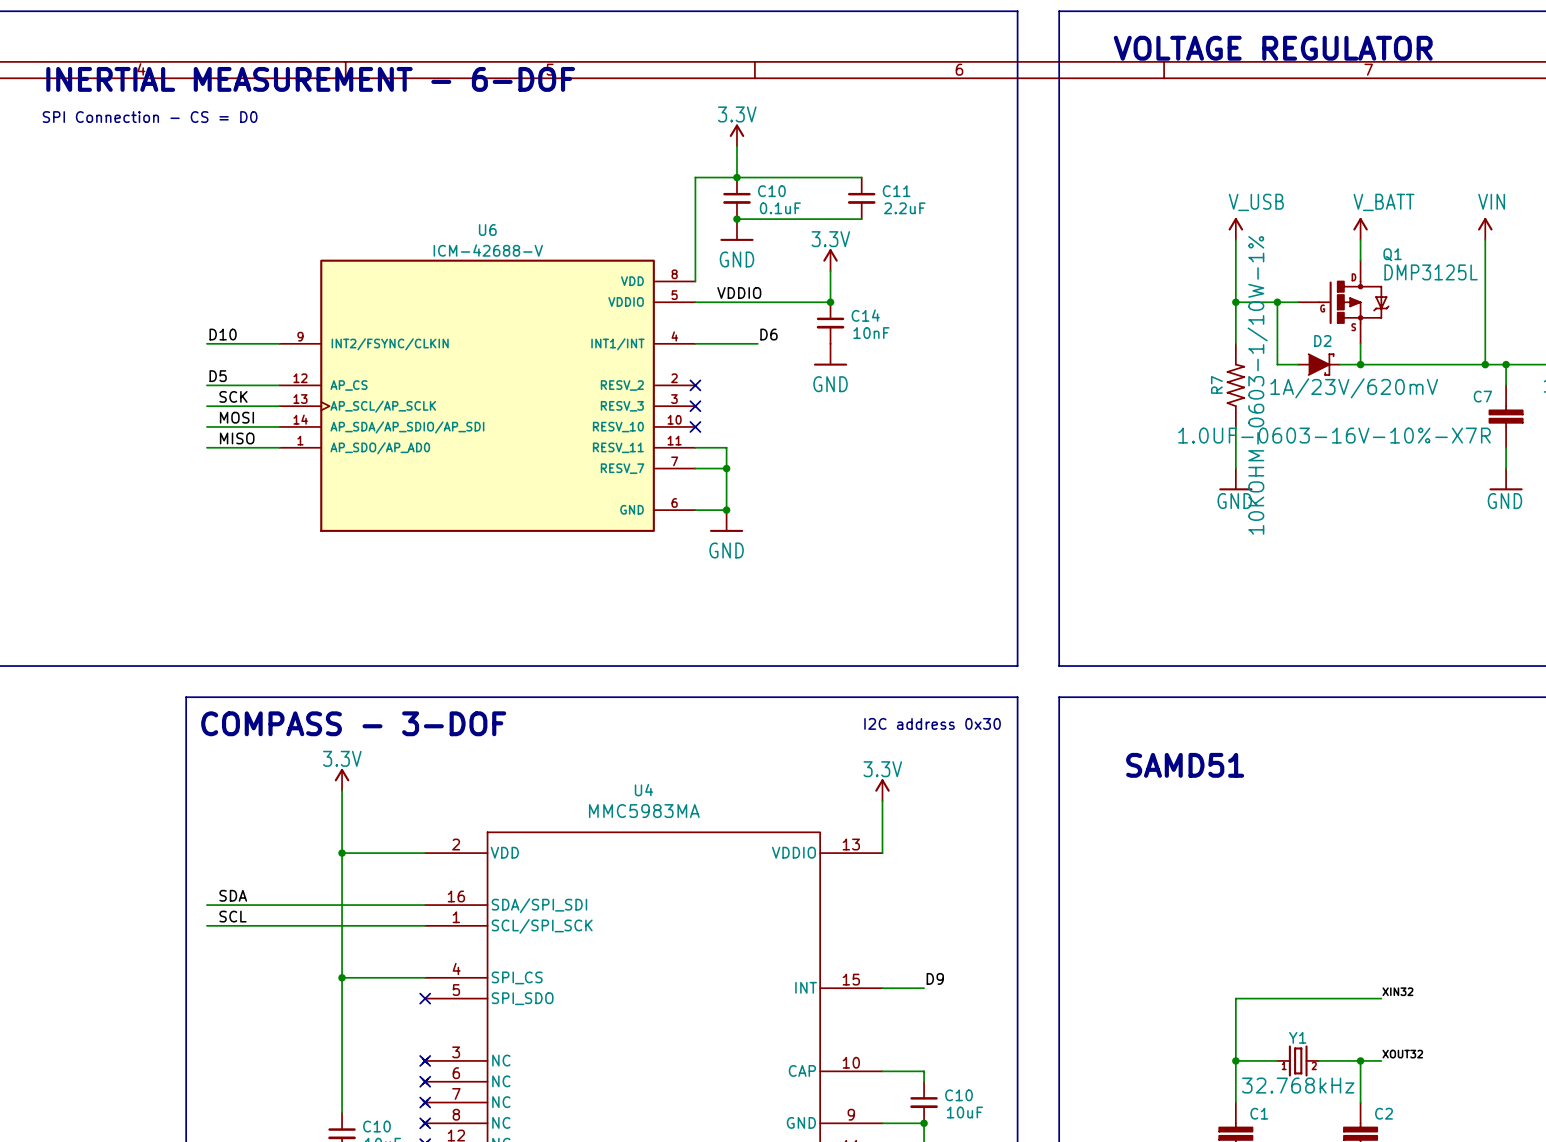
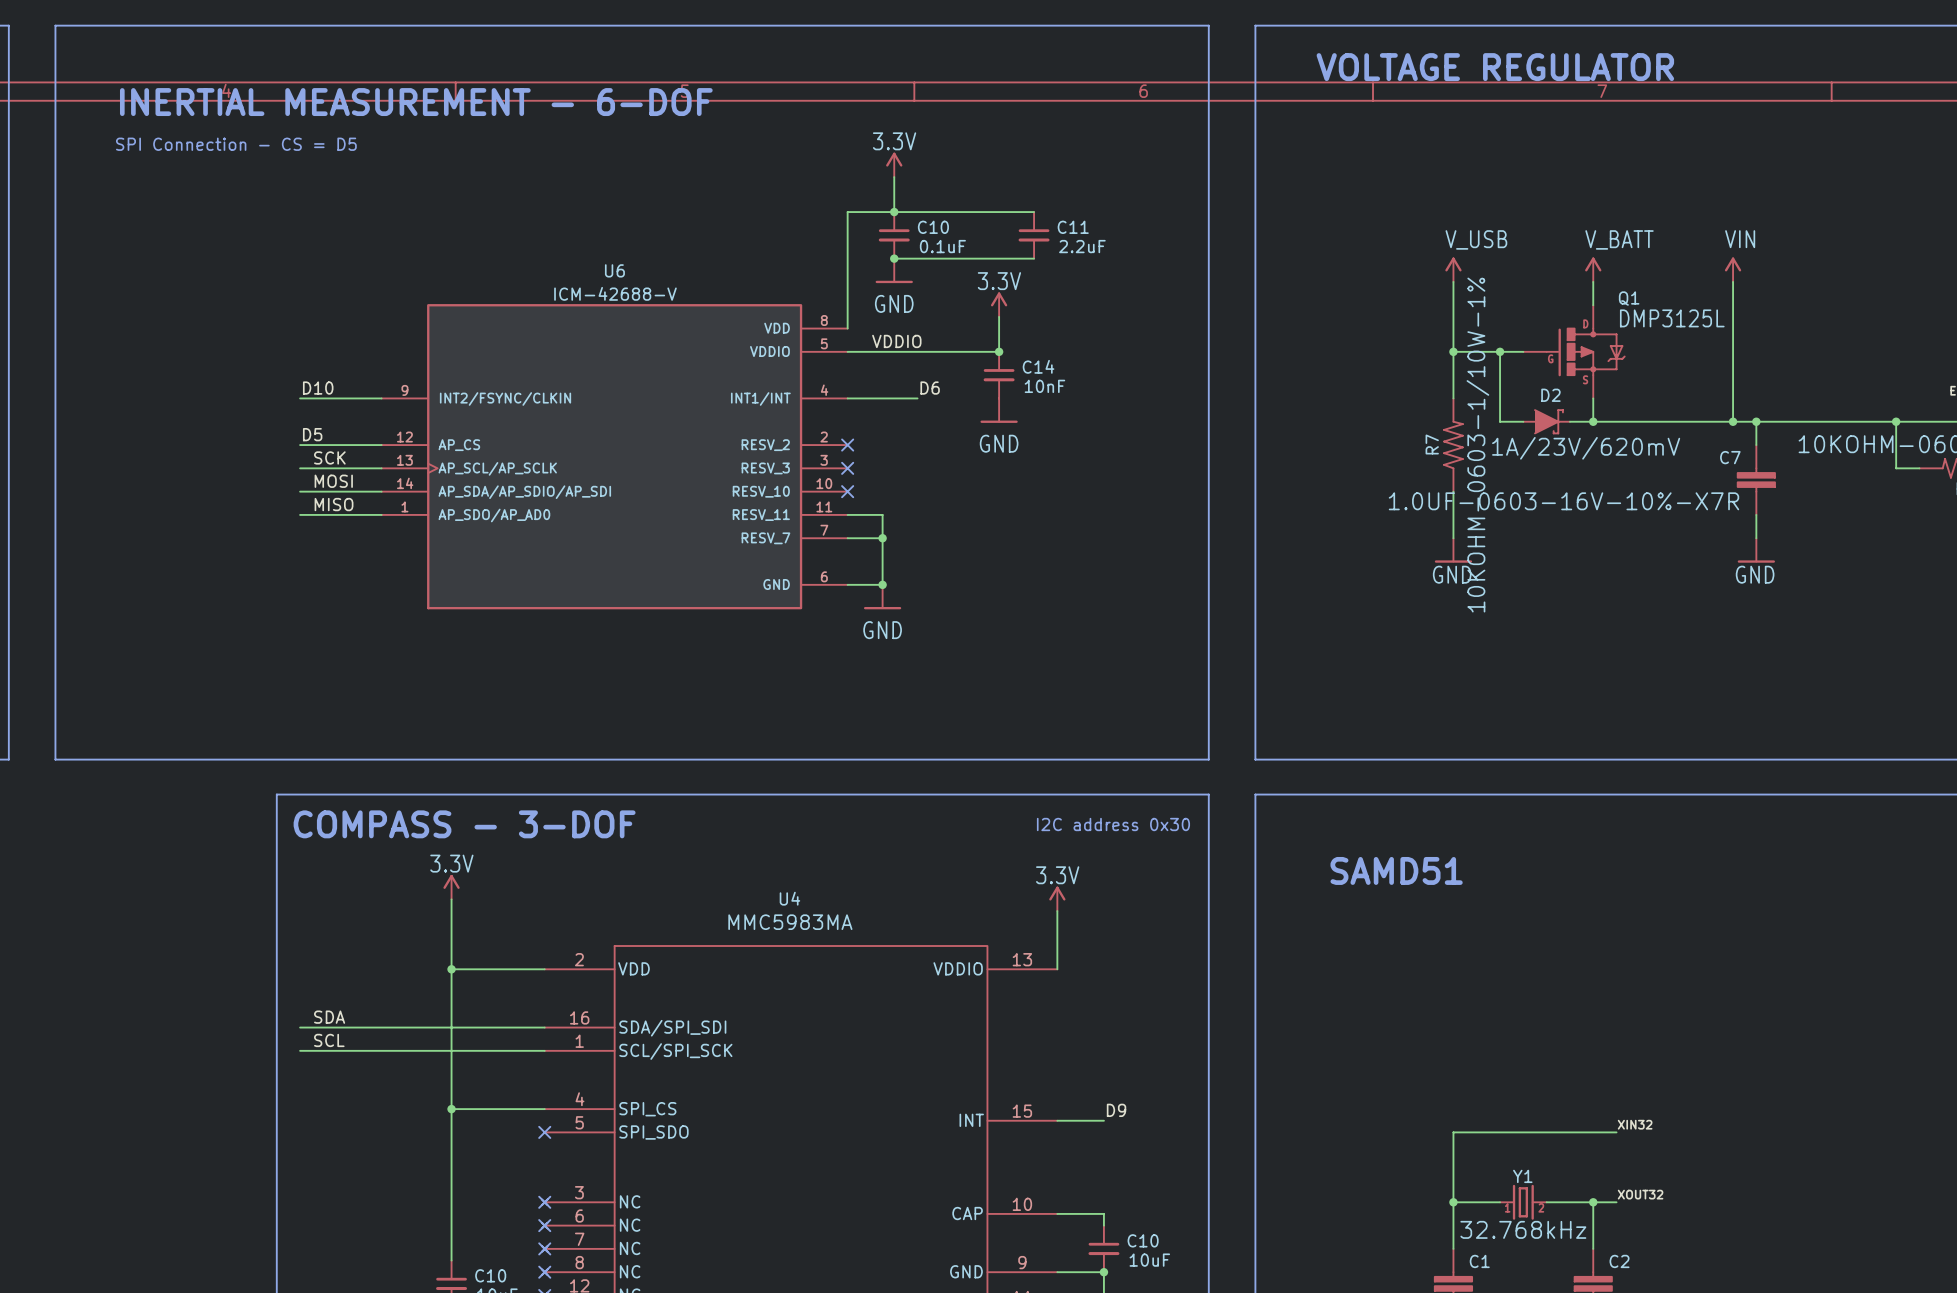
text: SPI Connection - CS = D0 (150, 117) -> SPI Connection - CS = D5 (236, 144)

